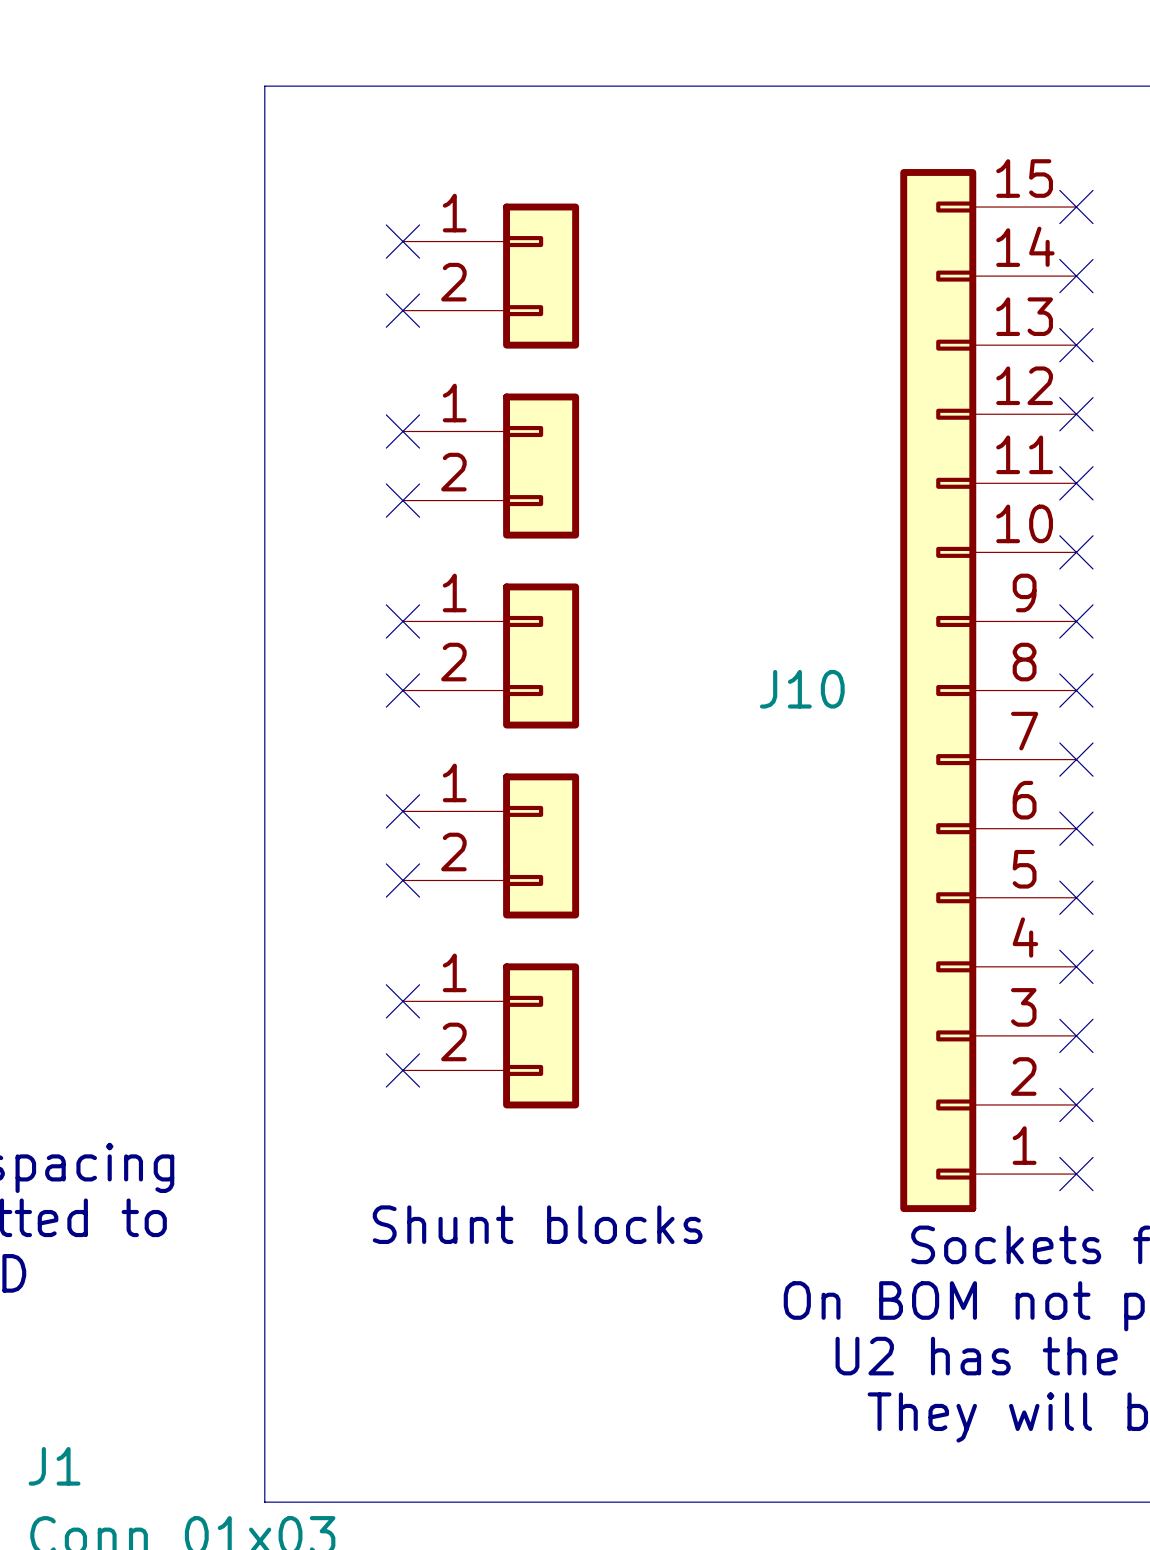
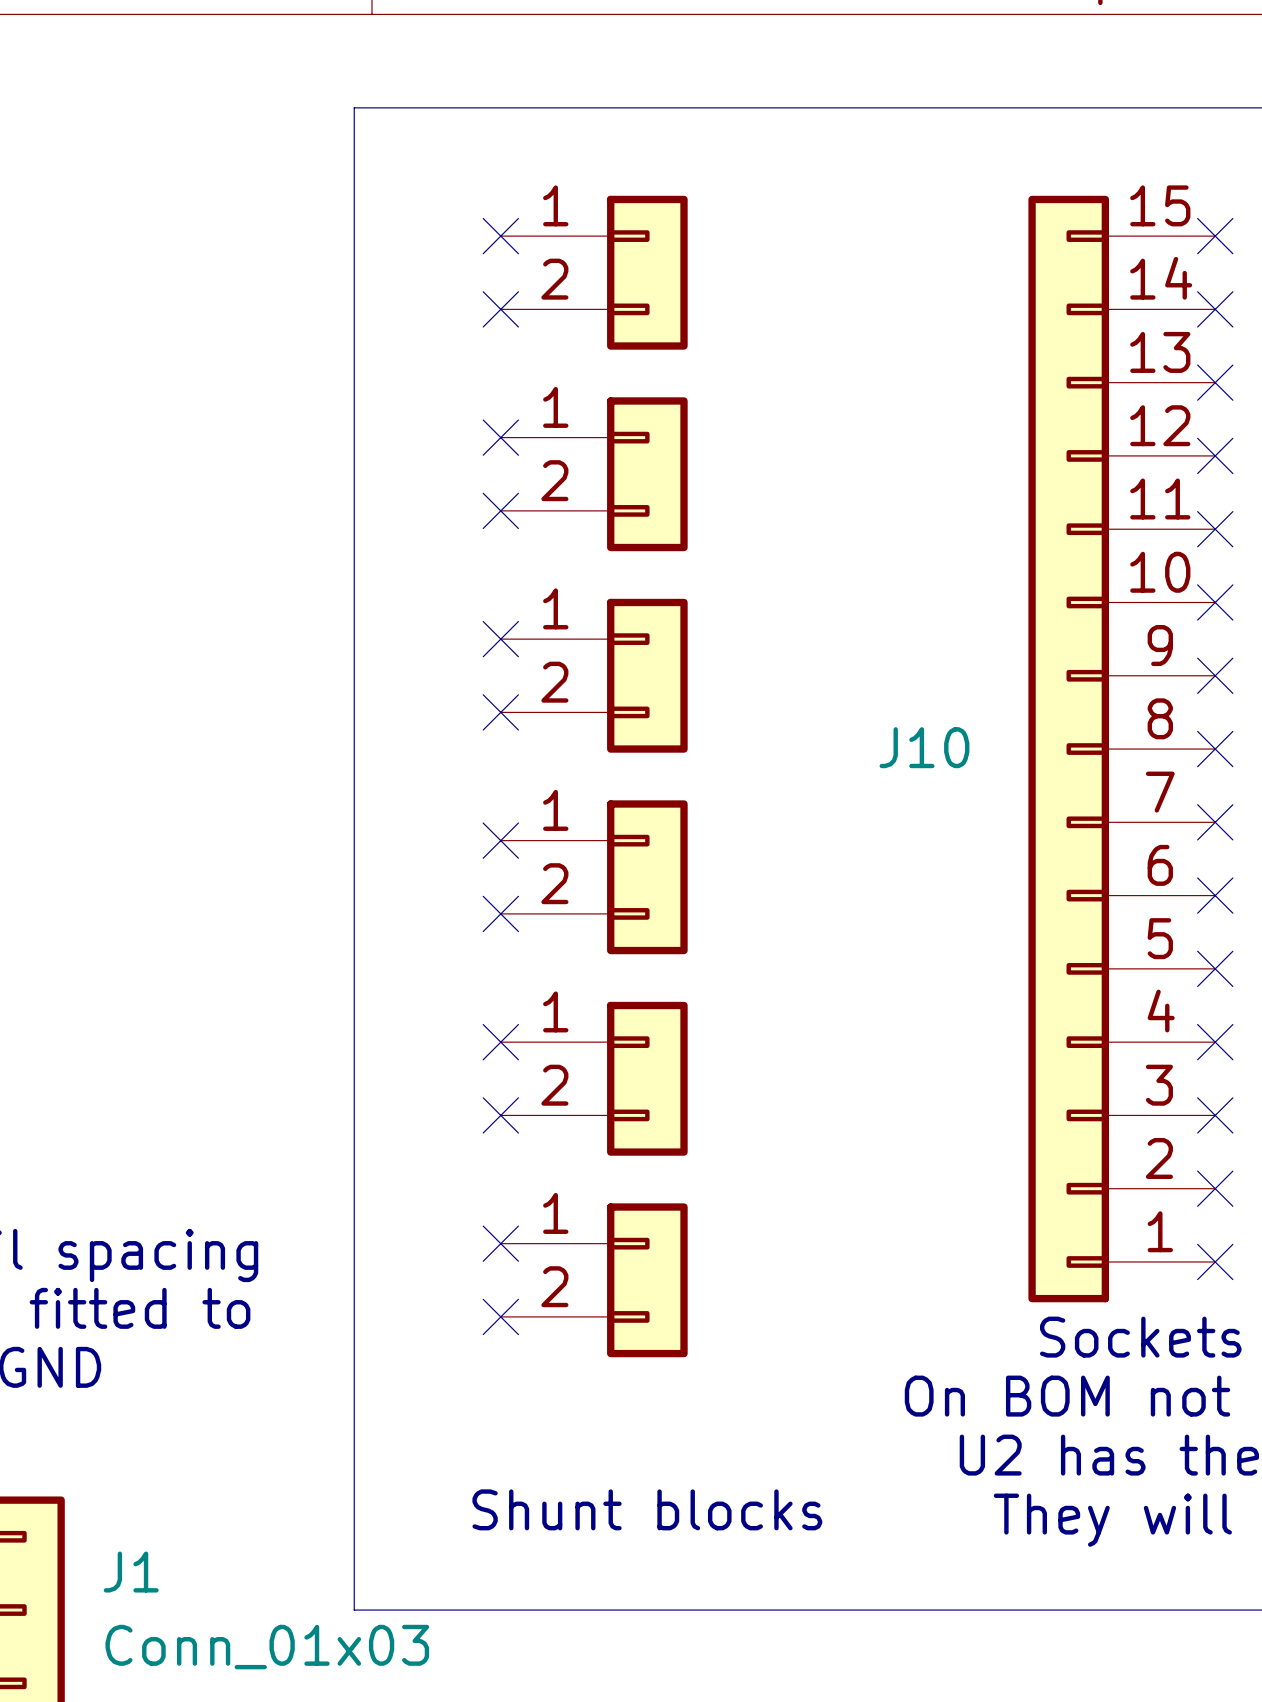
no-connect mark: none -> (500, 236)
no-connect mark: (402, 241) -> none
no-connect mark: none -> (500, 309)
part position: (491, 276) -> (594, 272)
no-connect mark: (402, 310) -> none
no-connect mark: none -> (500, 437)
no-connect mark: (402, 431) -> none
no-connect mark: none -> (500, 510)
part position: (491, 466) -> (594, 474)
no-connect mark: (402, 500) -> none
no-connect mark: none -> (500, 639)
no-connect mark: (402, 621) -> none
no-connect mark: none -> (500, 712)
part position: (491, 655) -> (594, 675)
no-connect mark: (402, 690) -> none
no-connect mark: none -> (500, 840)
no-connect mark: (402, 811) -> none
no-connect mark: none -> (500, 913)
part position: (491, 845) -> (594, 877)
no-connect mark: (402, 880) -> none
no-connect mark: none -> (500, 1042)
no-connect mark: (402, 1001) -> none
no-connect mark: none -> (500, 1115)
part position: (491, 1035) -> (594, 1078)
no-connect mark: (402, 1070) -> none
no-connect mark: none -> (500, 1243)
part: none -> (594, 1280)
text position: Shunt blocks (537, 1224) -> Shunt blocks (647, 1509)
no-connect mark: none -> (500, 1316)

